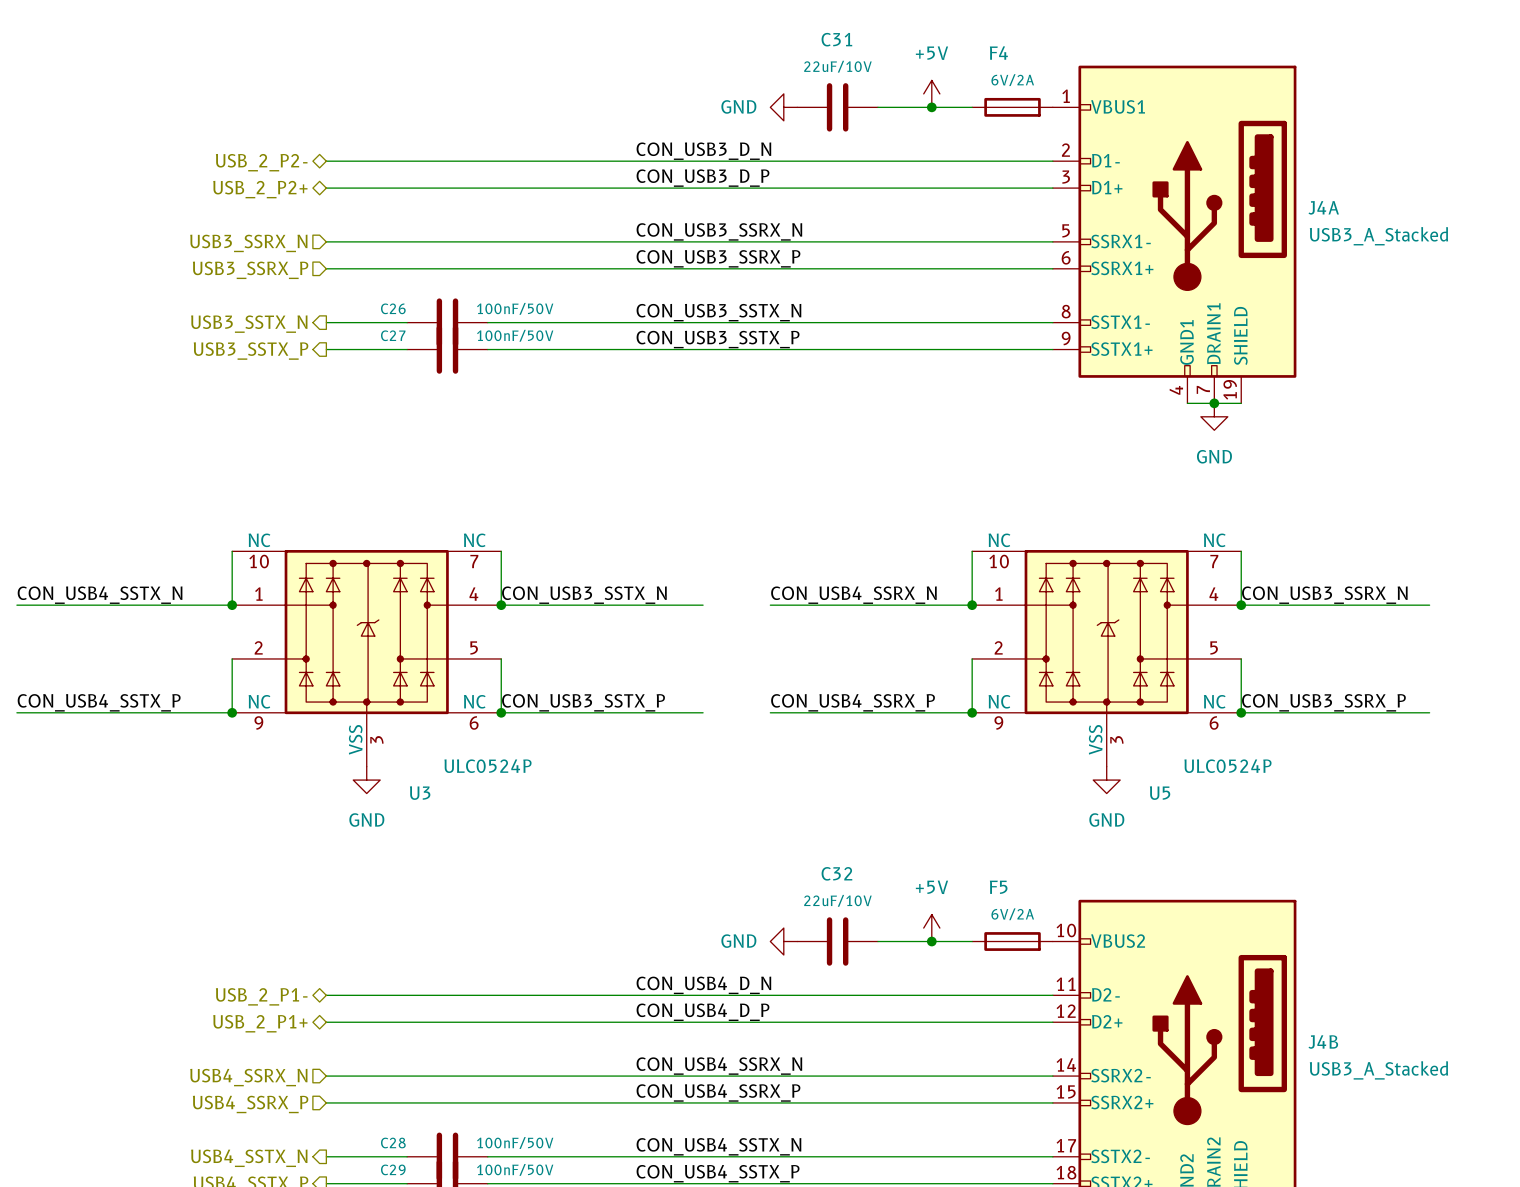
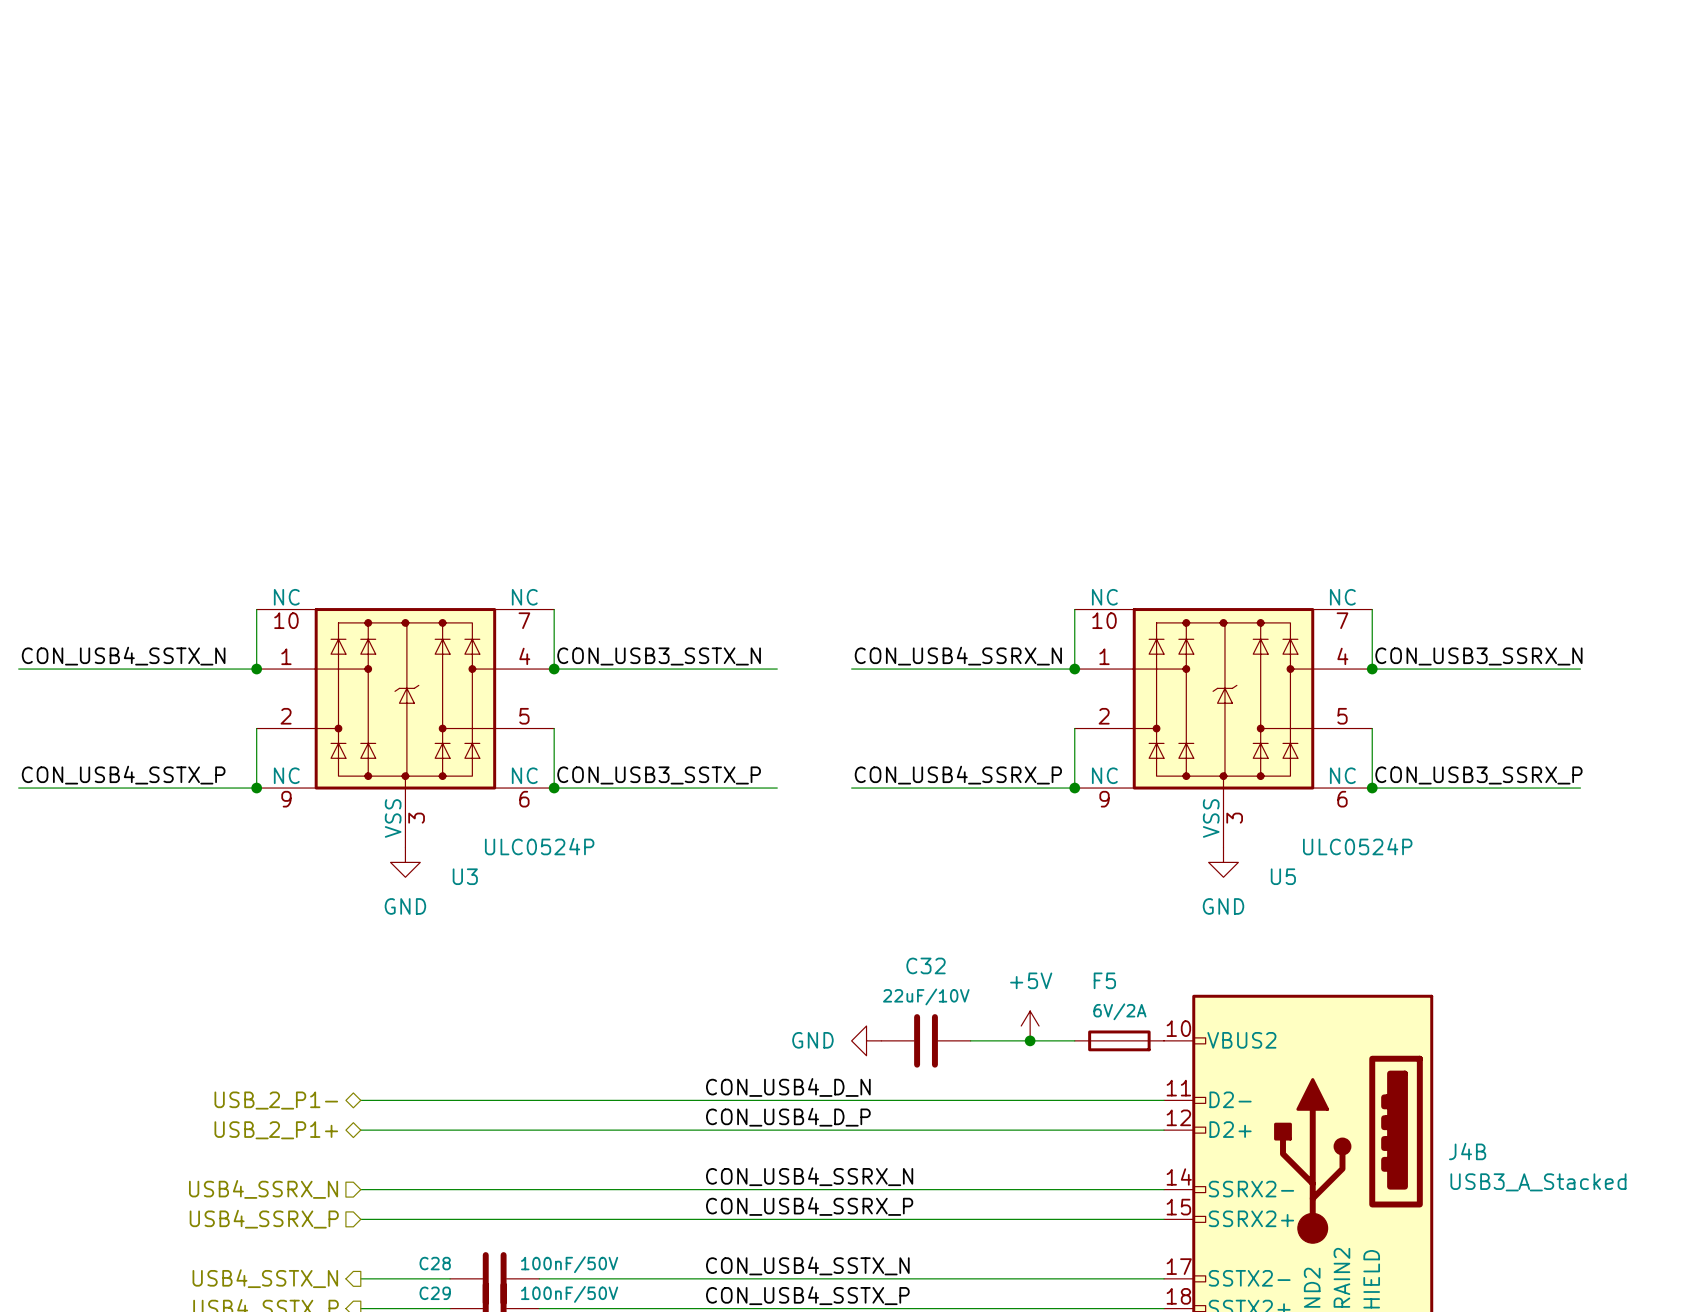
power symbol: +5V (931, 93) -> none
power symbol: GND (783, 107) -> none
C31: 22uF/10V (837, 107) -> none
wire: (877, 107) (972, 107) -> none
junction: (931, 107) -> none
F4: 6V/2A (1012, 107) -> none
label: CON_USB3_D_N (703, 151) -> none
wire: (326, 161) (1052, 161) -> none
hierarchical label: USB_2_P2- (261, 162) -> none
label: CON_USB3_D_P (702, 178) -> none
wire: (326, 188) (1052, 188) -> none
hierarchical label: USB_2_P2+ (260, 189) -> none
label: CON_USB3_SSRX_N (719, 231) -> none
J4A: USB3_A_Stacked (1174, 234) -> none
wire: (326, 241) (1052, 241) -> none
hierarchical label: USB3_SSRX_N (248, 243) -> none
label: CON_USB3_SSRX_P (718, 258) -> none
wire: (326, 268) (1052, 268) -> none
hierarchical label: USB3_SSRX_P (250, 270) -> none
label: CON_USB3_SSTX_N (718, 312) -> none
wire: (326, 322) (407, 322) -> none
C26: 100nF/50V (447, 322) -> none
wire: (487, 322) (1052, 322) -> none
hierarchical label: USB3_SSTX_N (249, 324) -> none
label: CON_USB3_SSTX_P (718, 339) -> none
wire: (326, 349) (407, 349) -> none
C27: 100nF/50V (447, 349) -> none
wire: (487, 349) (1052, 349) -> none
hierarchical label: USB3_SSTX_P (251, 351) -> none
wire: (1187, 403) (1241, 403) -> none
junction: (1214, 403) -> none
power symbol: GND (1214, 416) -> none

